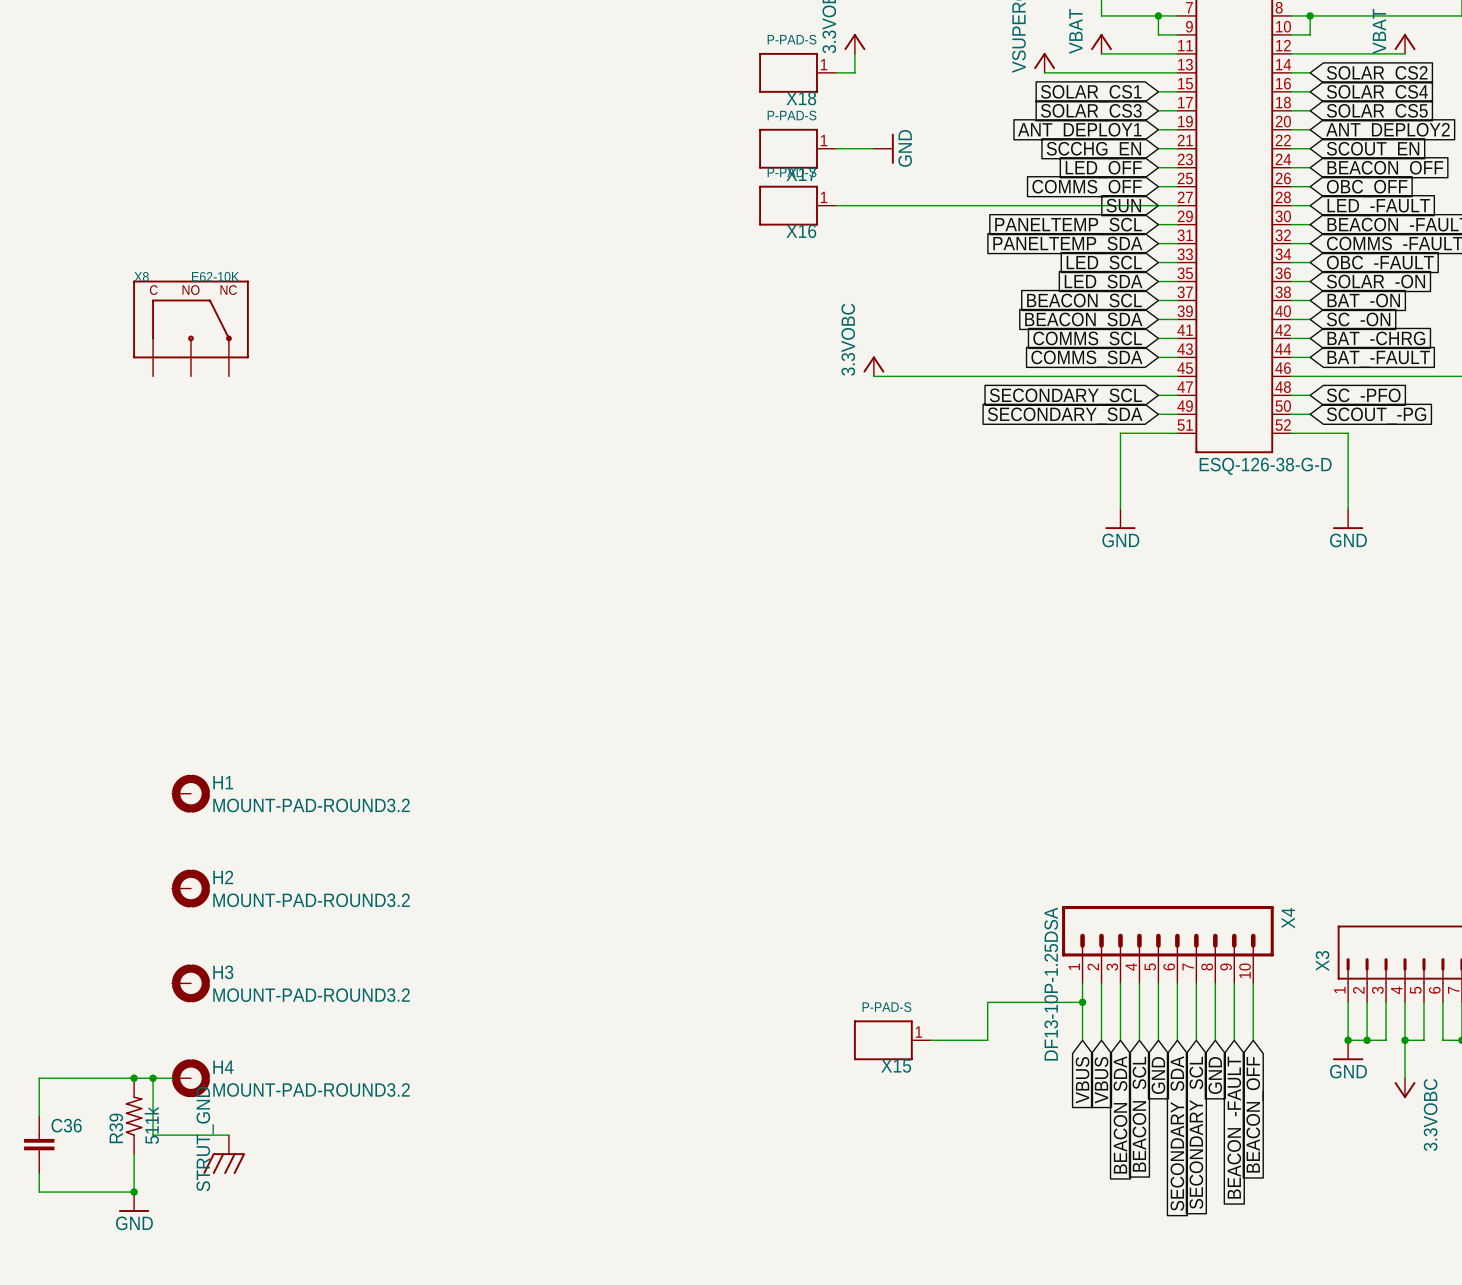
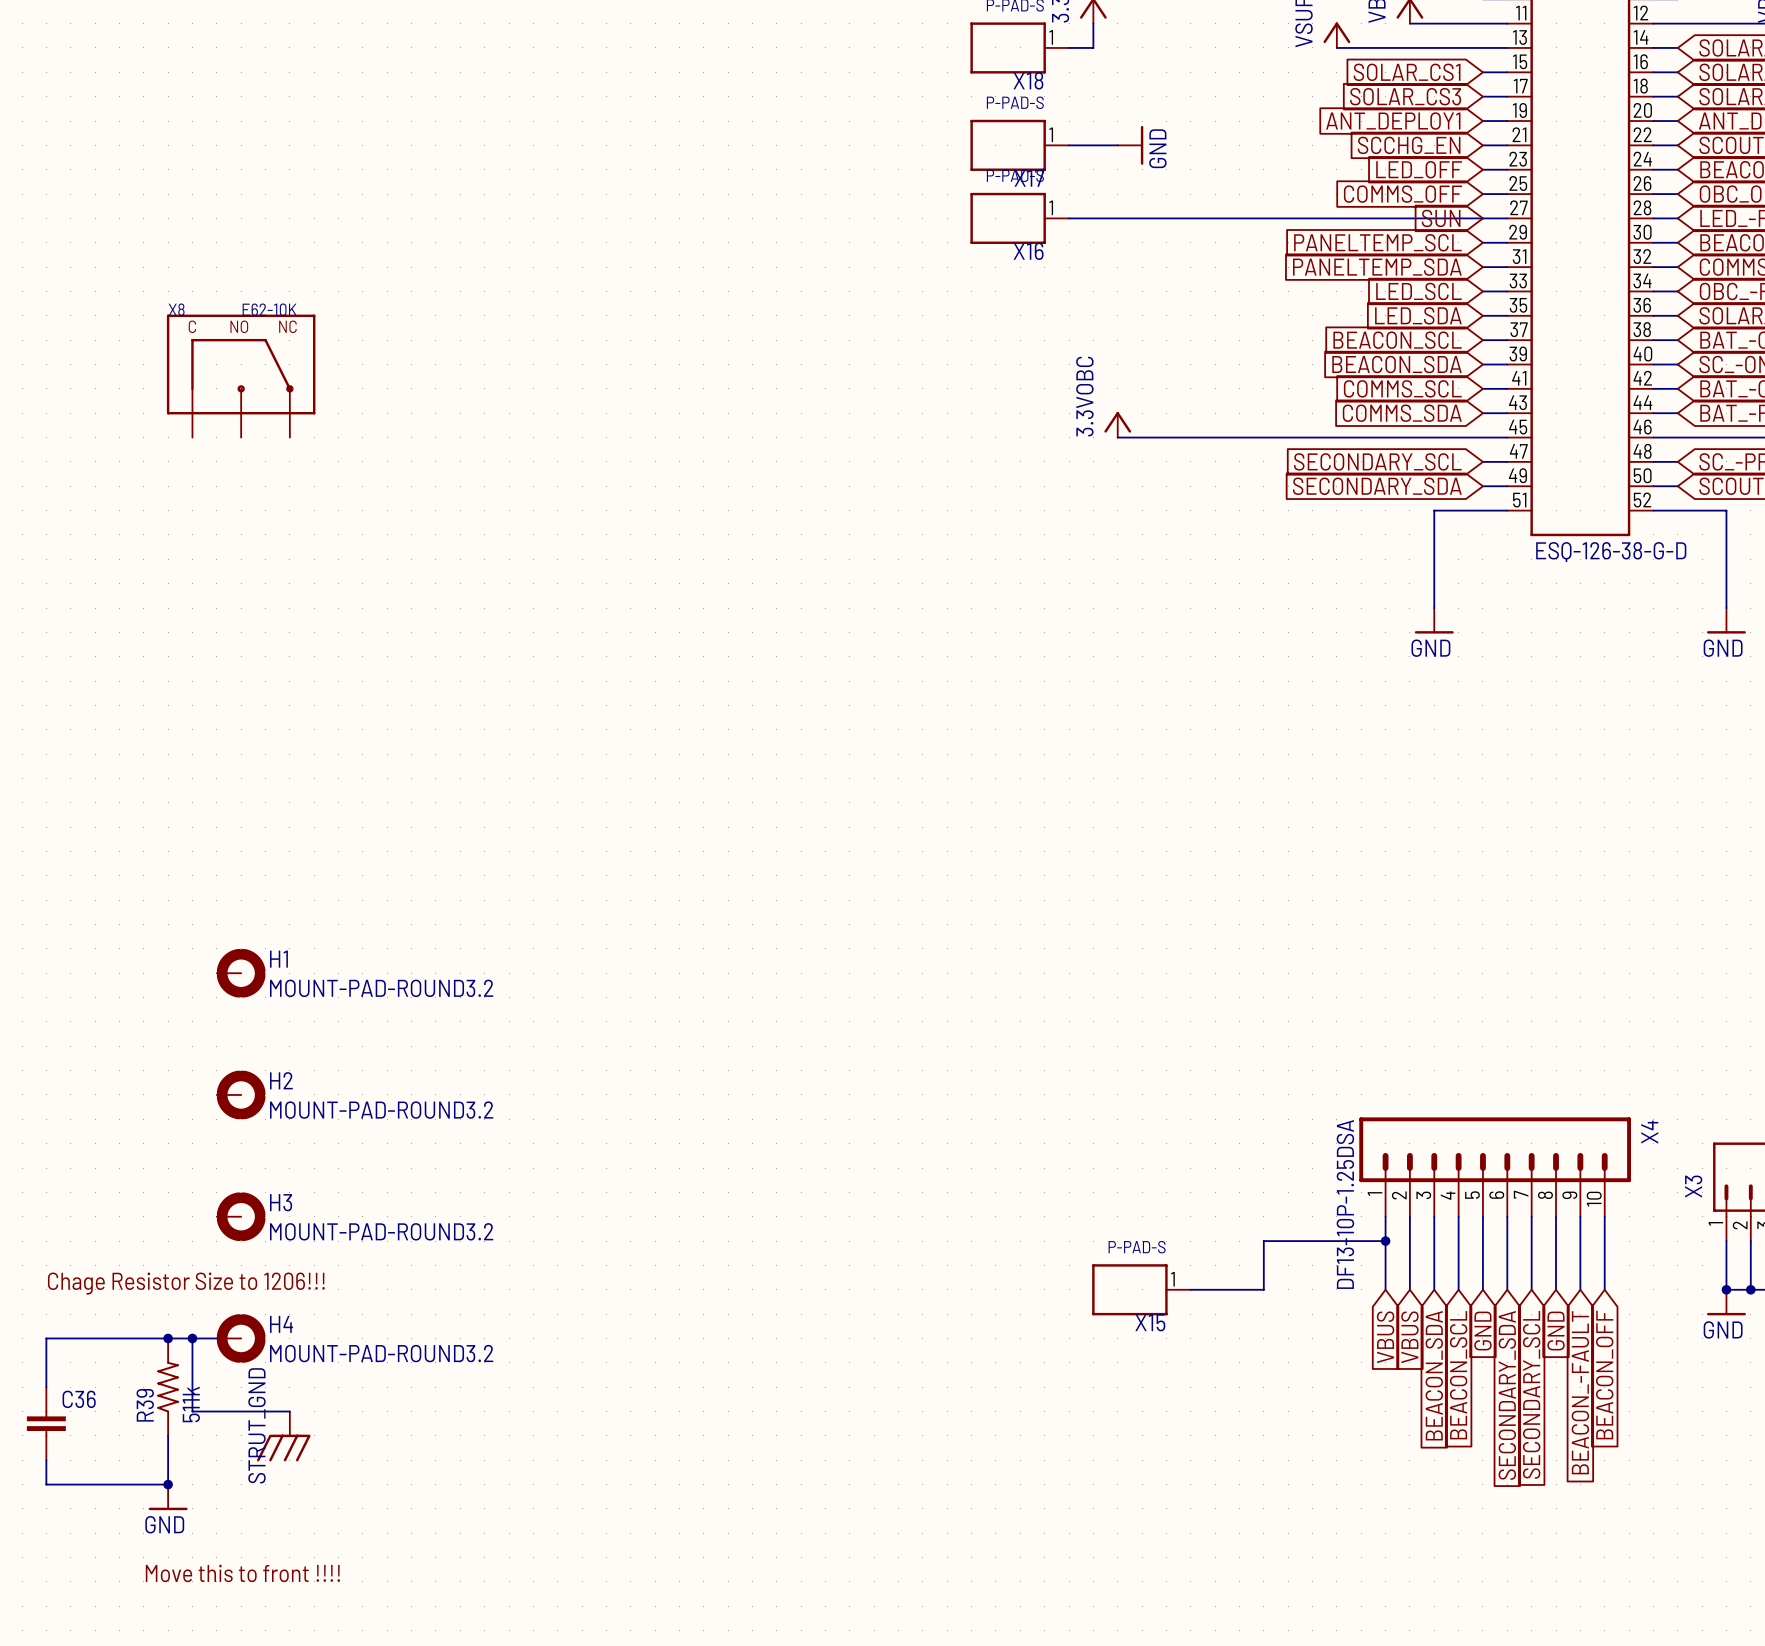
text: none -> Chage Resistor Size to 1206!!! (186, 1283)
text: none -> Move this to front !!!! (242, 1573)

